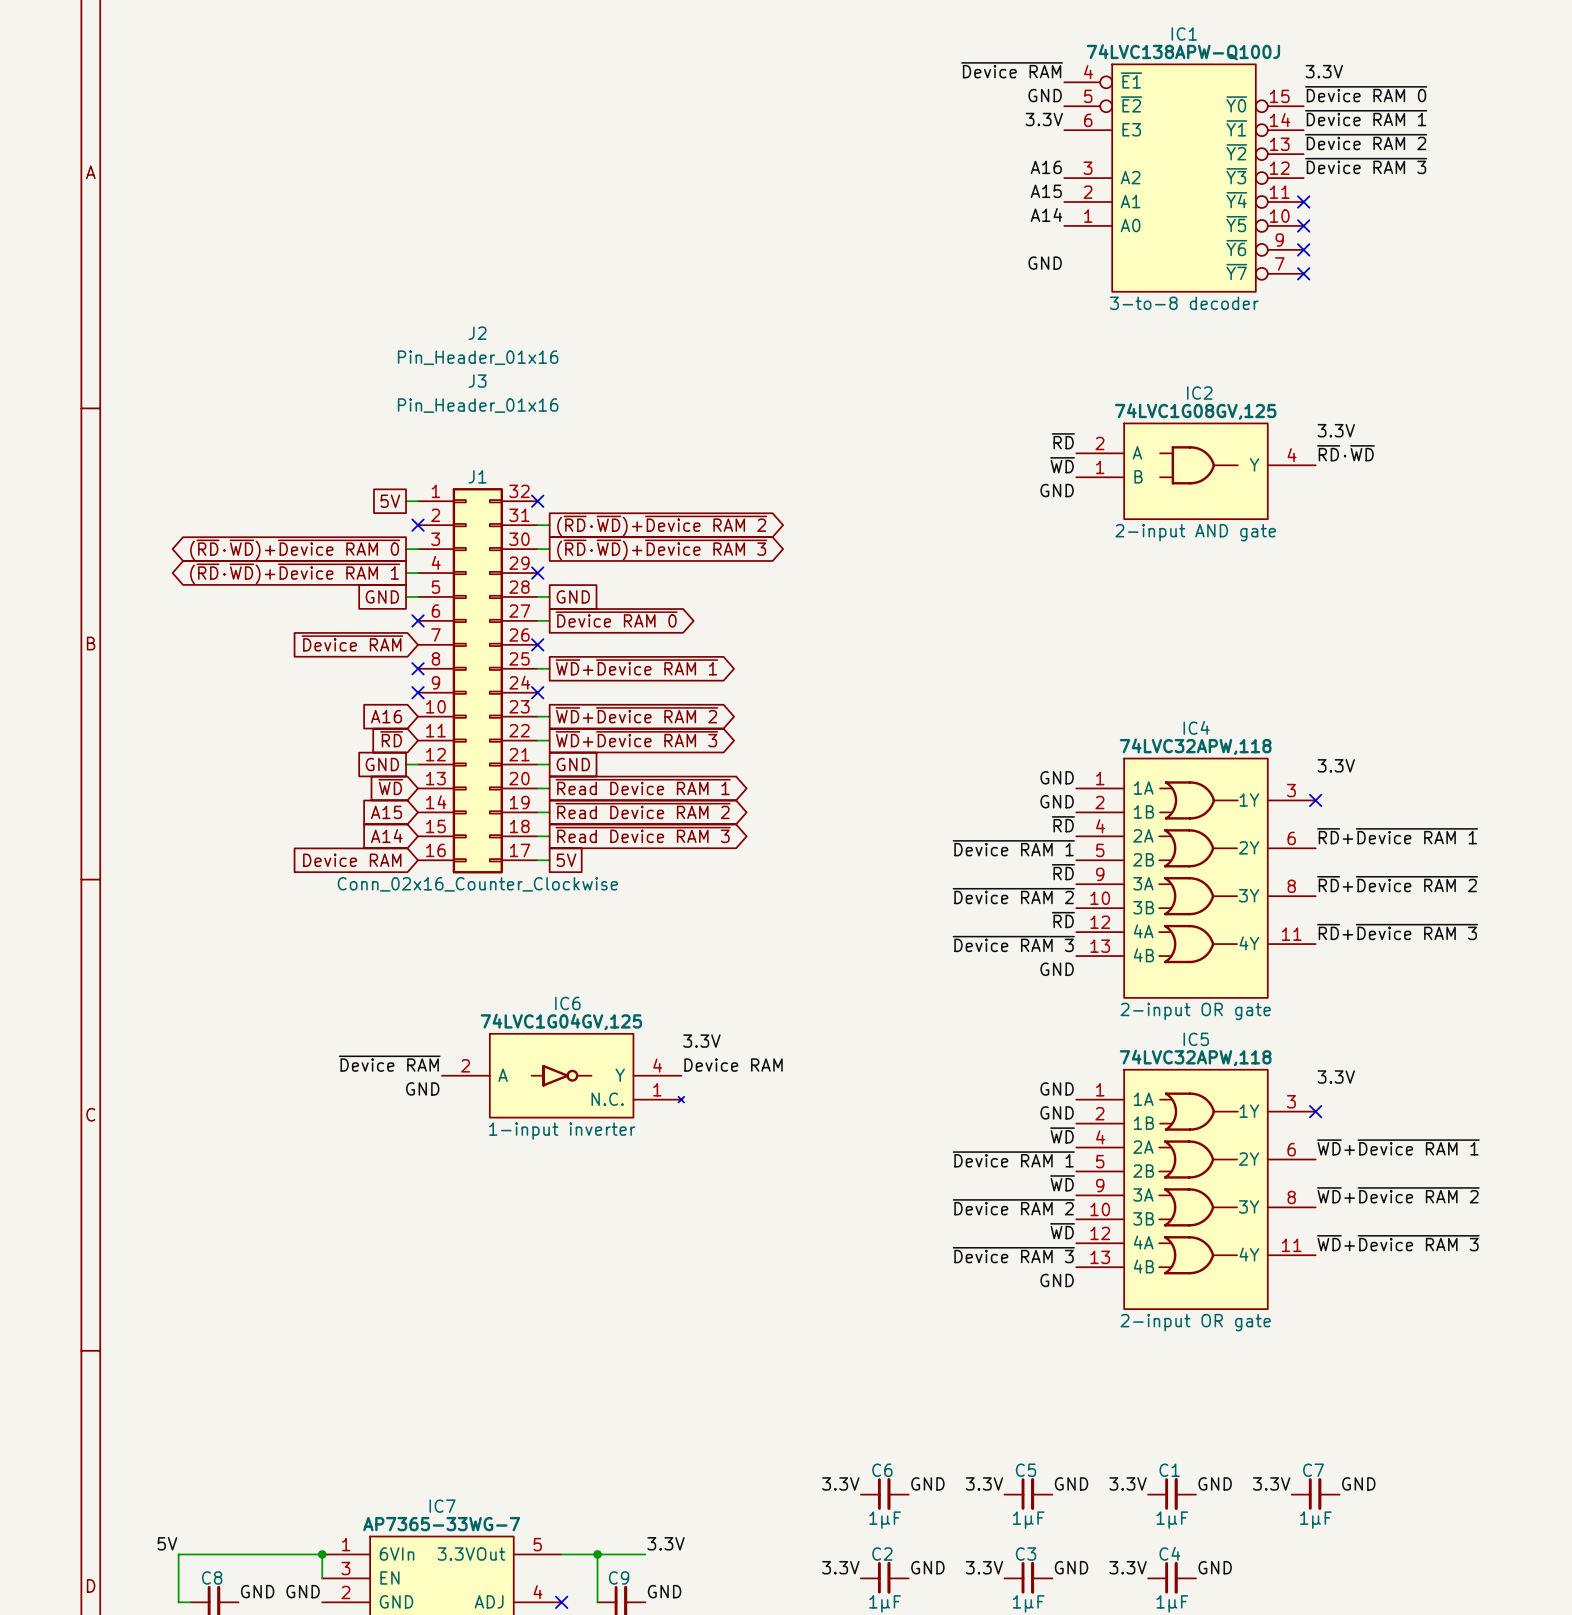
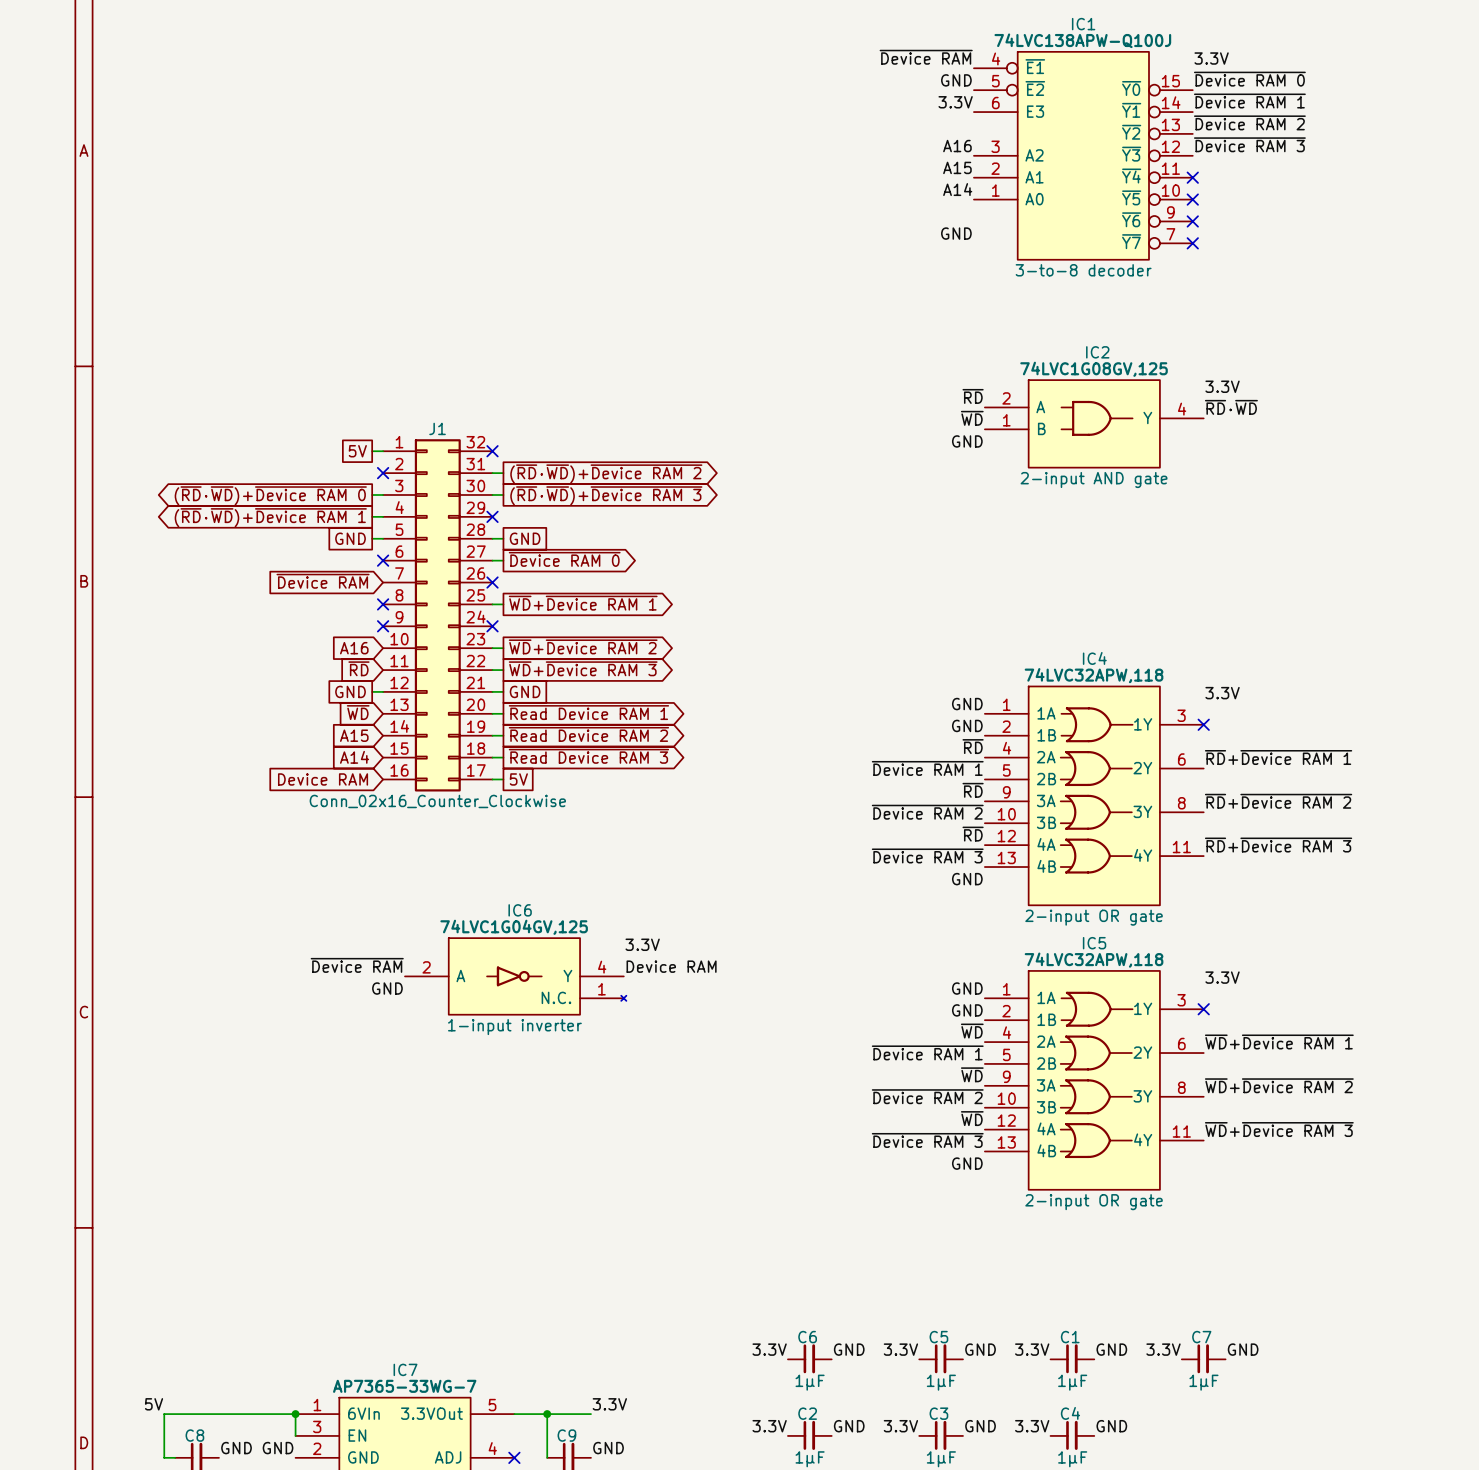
J2: Pin_Header_01x16 (478, 345) -> none
J3: Pin_Header_01x16 (478, 393) -> none

